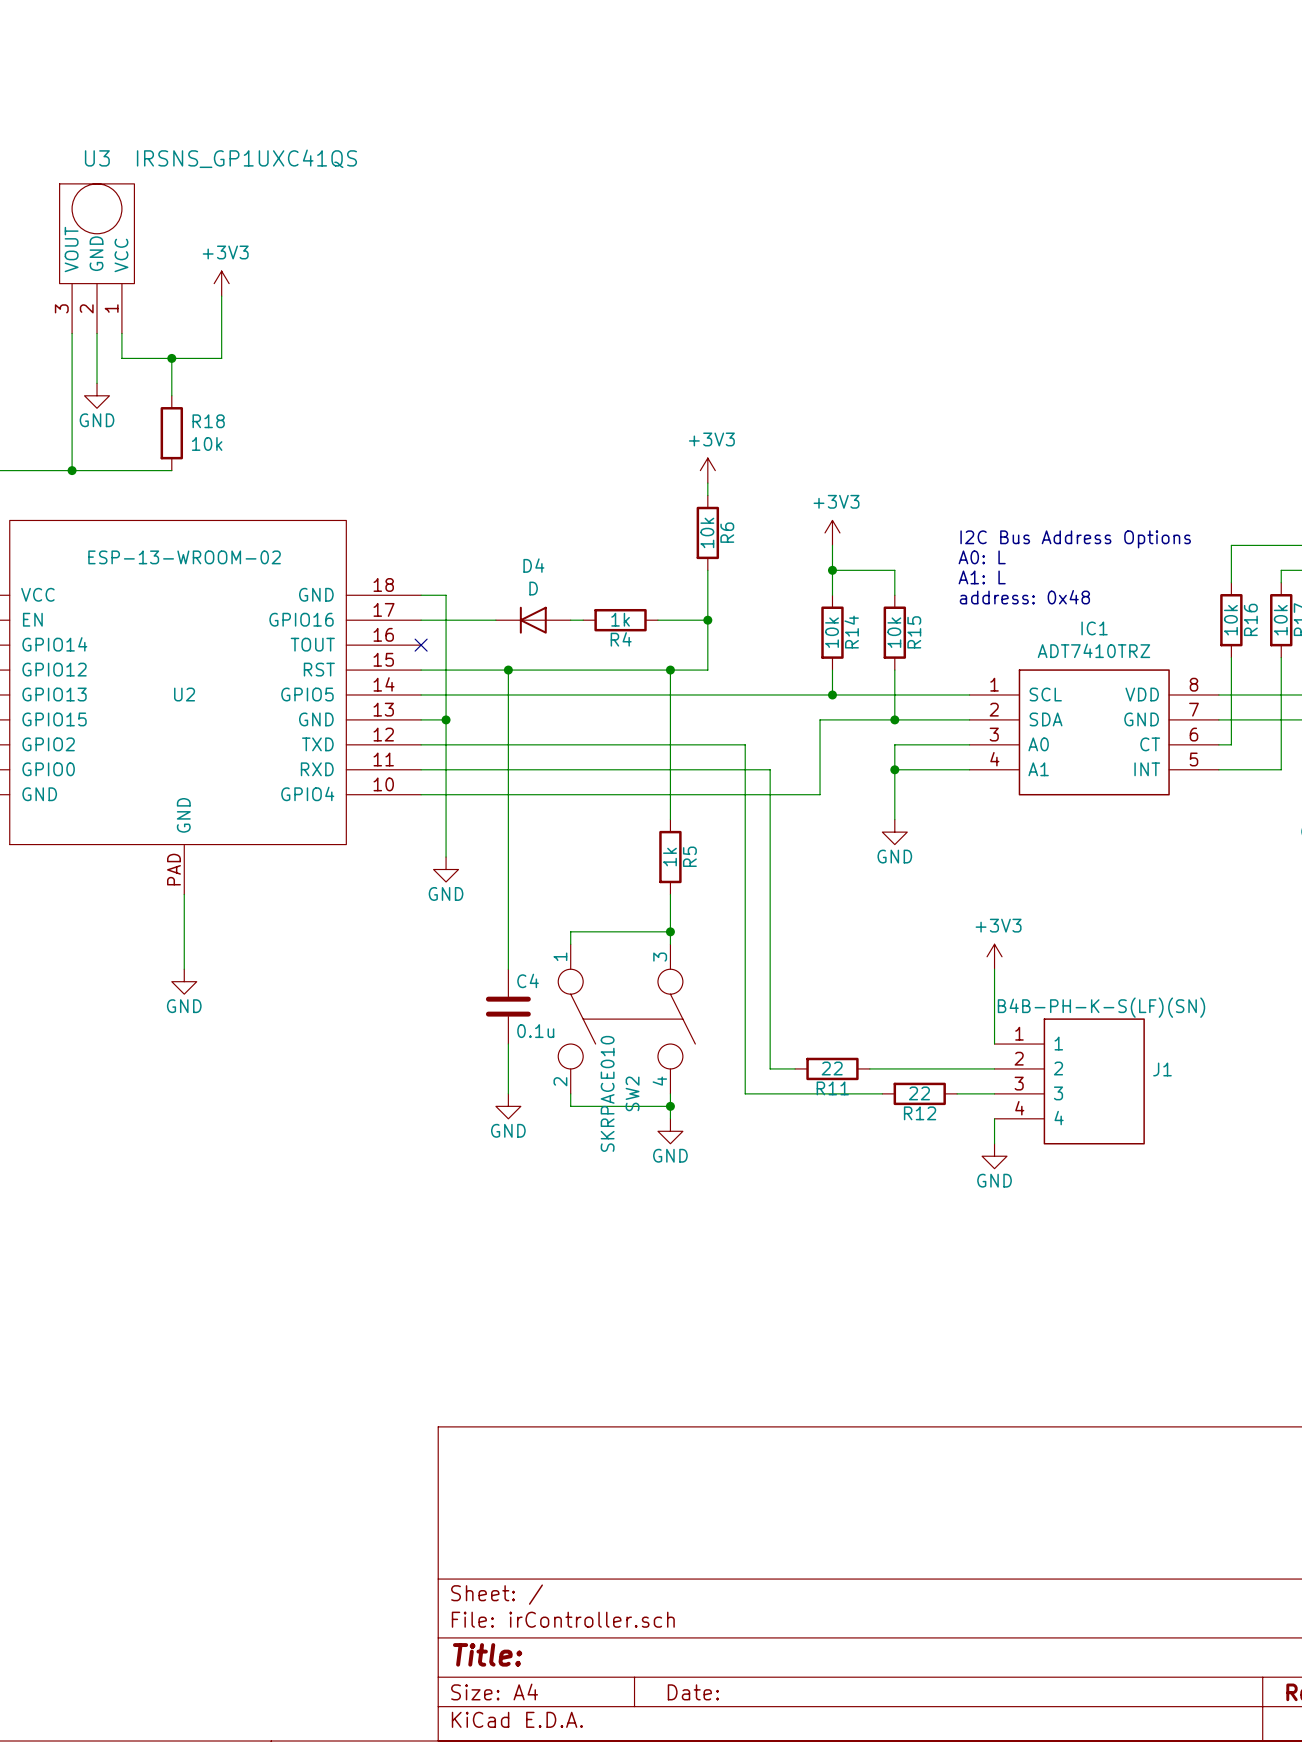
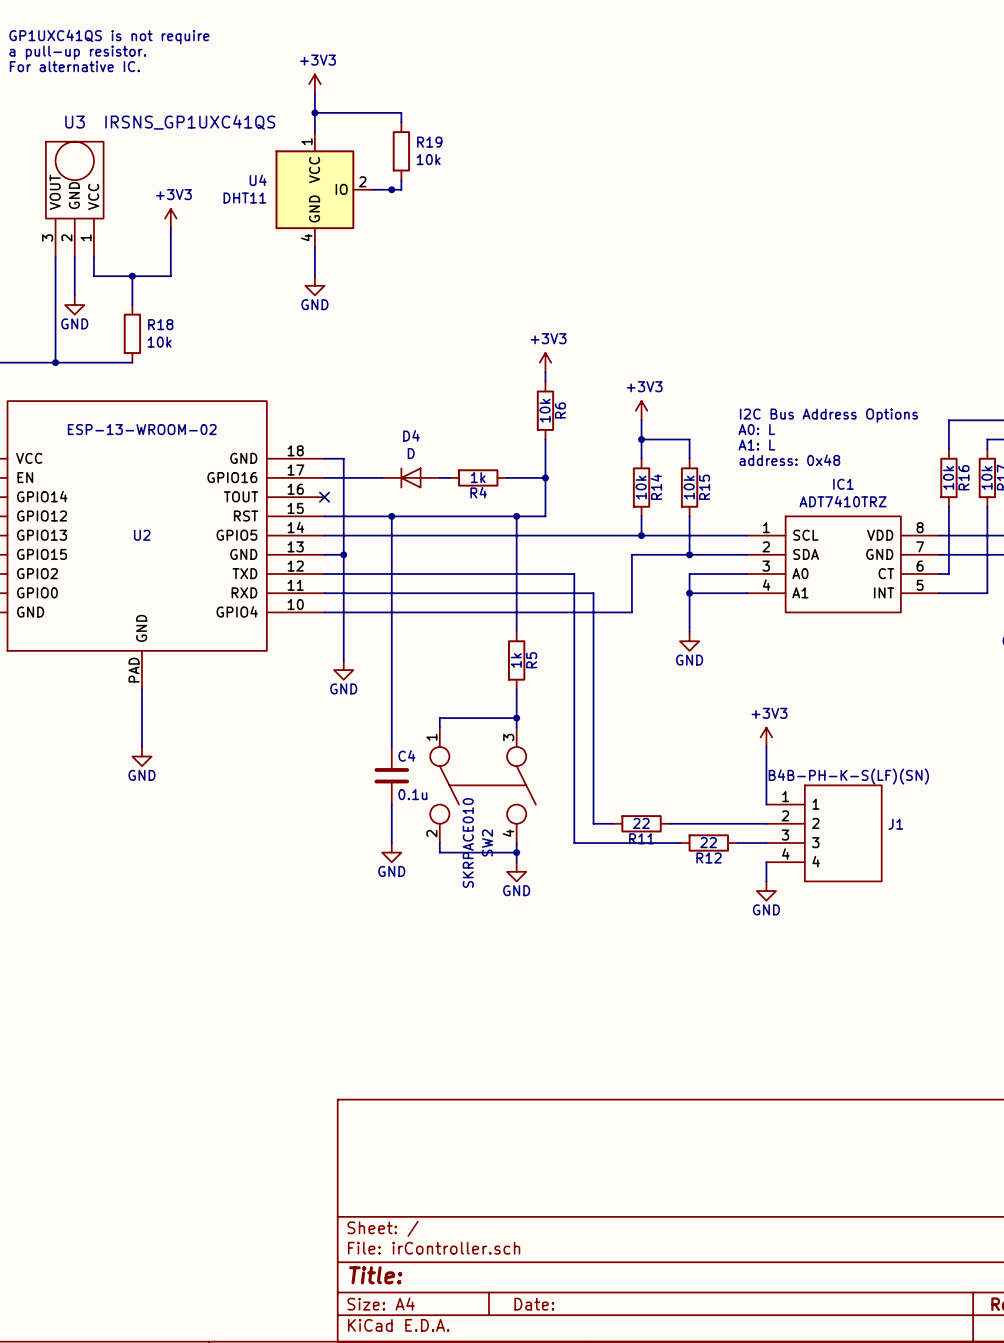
text: none -> GP1UXC41QS is not require (109, 37)
text: none -> a pull-up resistor. (77, 52)
text: none -> For alternative IC. (74, 66)
power symbol: none -> +3V3 (314, 84)
wire: none -> (314, 93) (314, 132)
wire: none -> (314, 112) (401, 112) (401, 122)
junction: none -> (314, 112)
R19: none -> 10k (401, 151)
wire: none -> (401, 180) (401, 189) (372, 189)
U4: none -> DHT11 (324, 189)
junction: none -> (391, 189)
wire: none -> (314, 247) (314, 276)
power symbol: none -> GND (314, 285)

